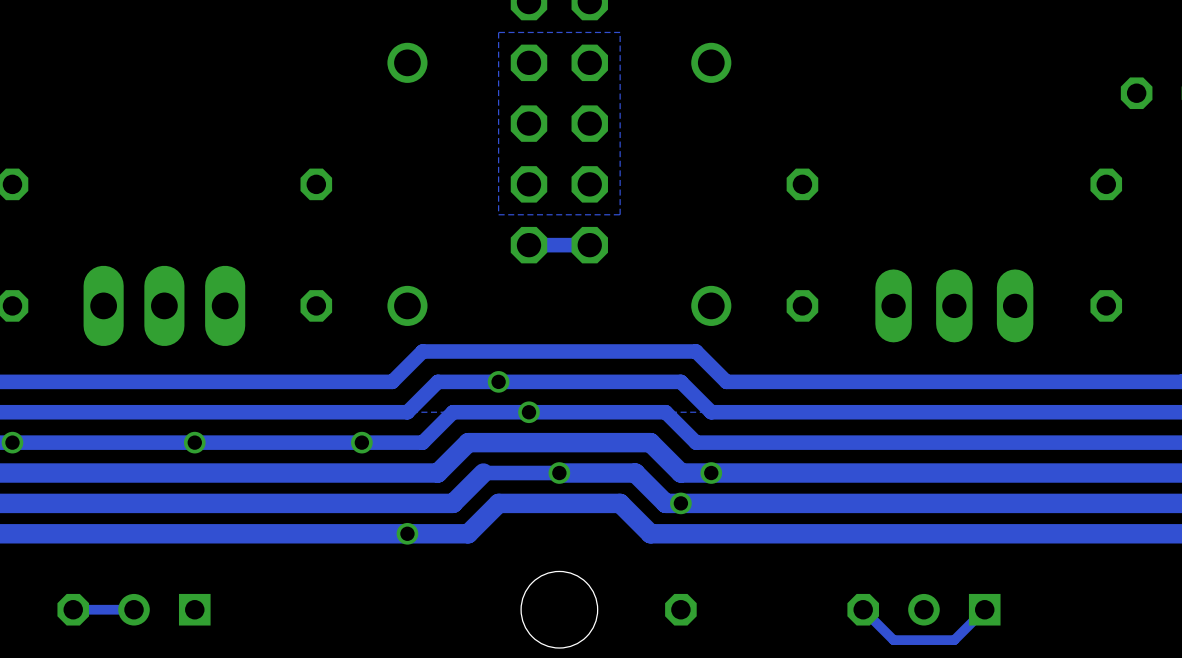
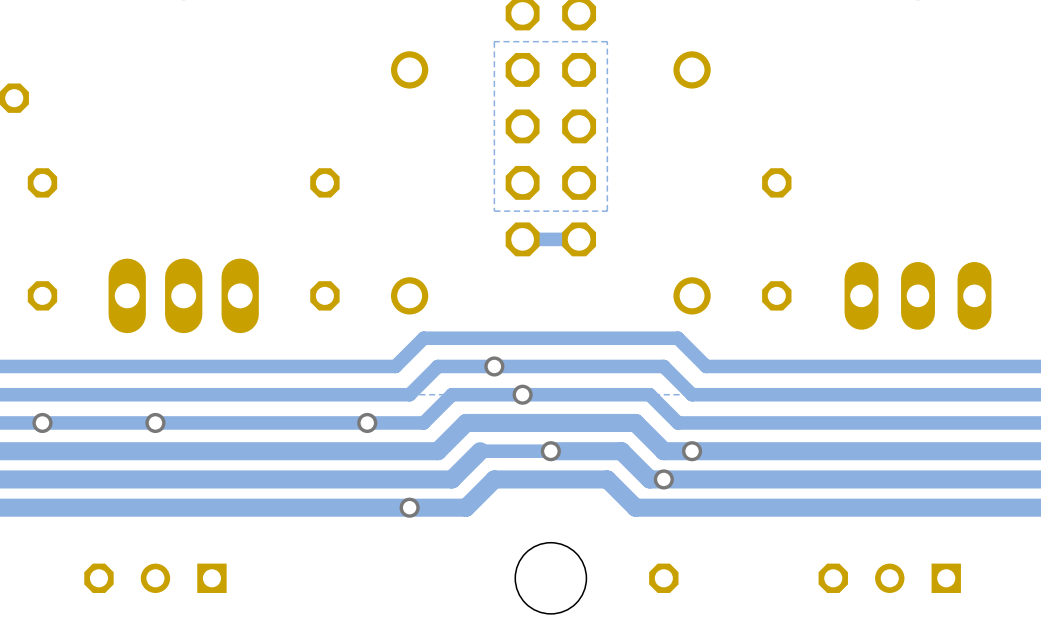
via position: (194, 442) -> (155, 422)
track: (134, 609) (73, 609) -> none
track: (984, 609) (954, 640) (893, 640) (863, 609) -> none

